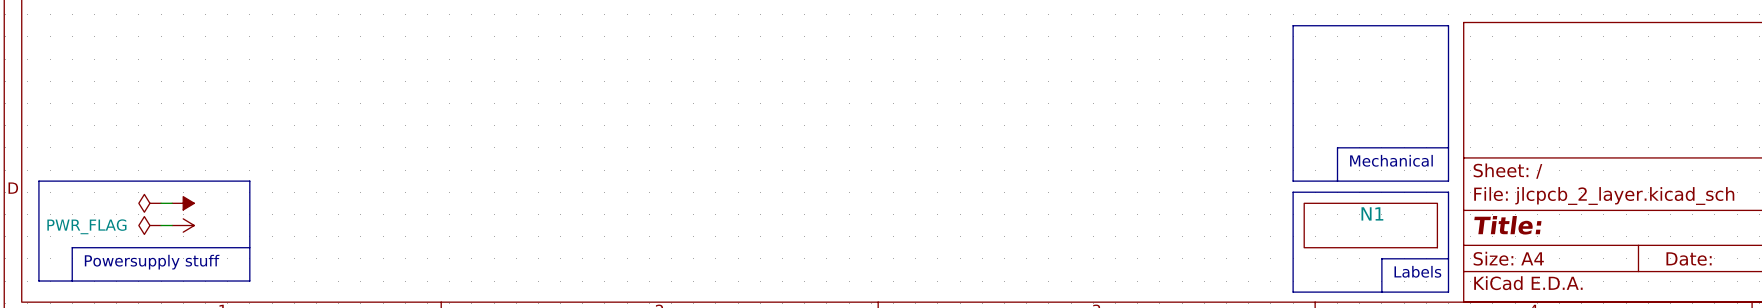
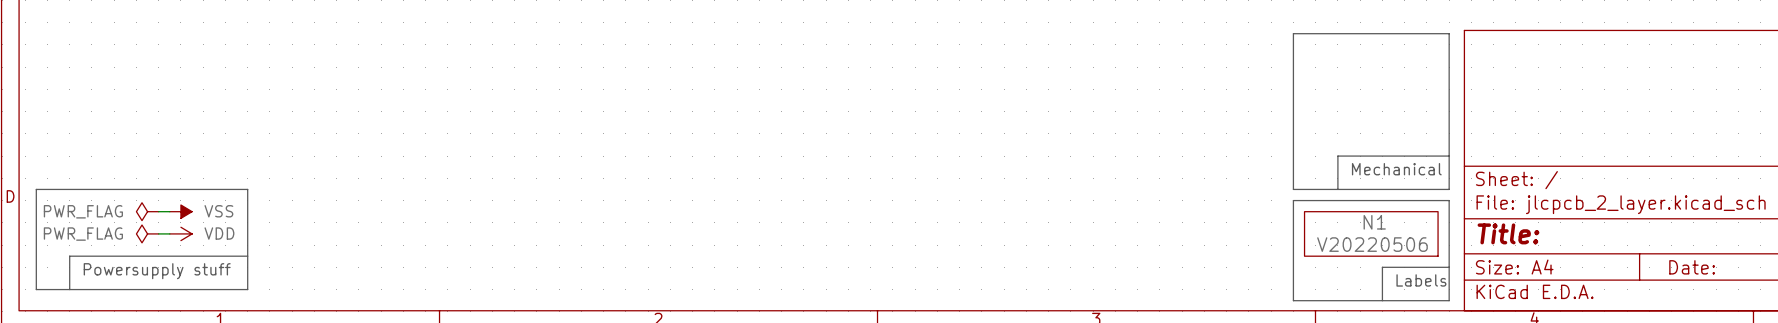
power symbol text: none -> VSS (218, 211)
power symbol text: none -> PWR_FLAG (83, 211)
power symbol text: none -> VDD (219, 233)
N1 value: none -> V20220506 (1372, 244)

